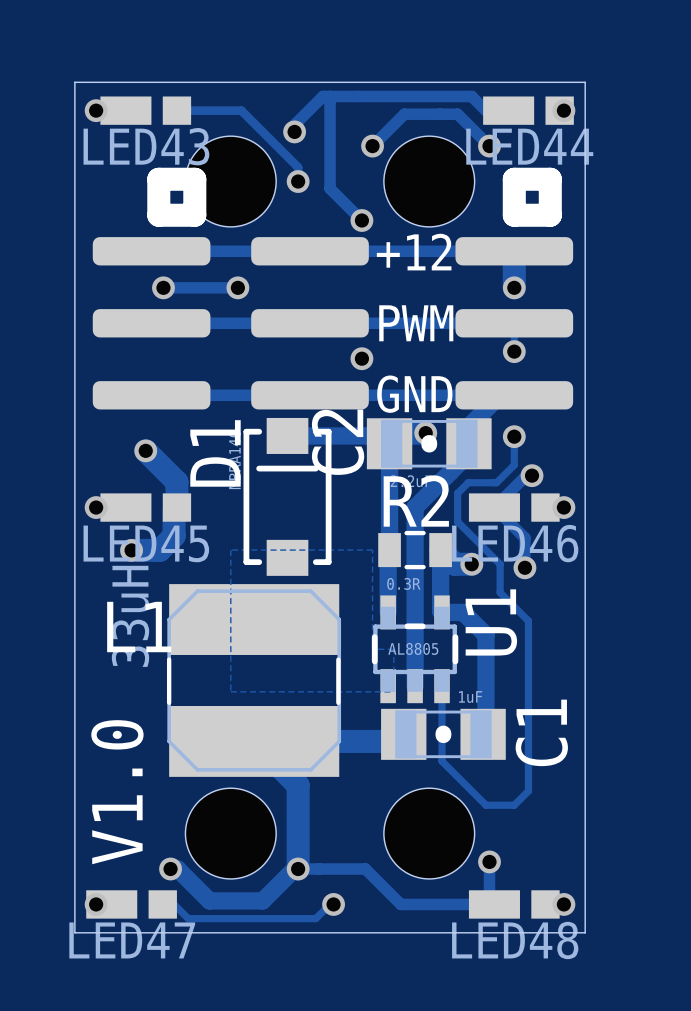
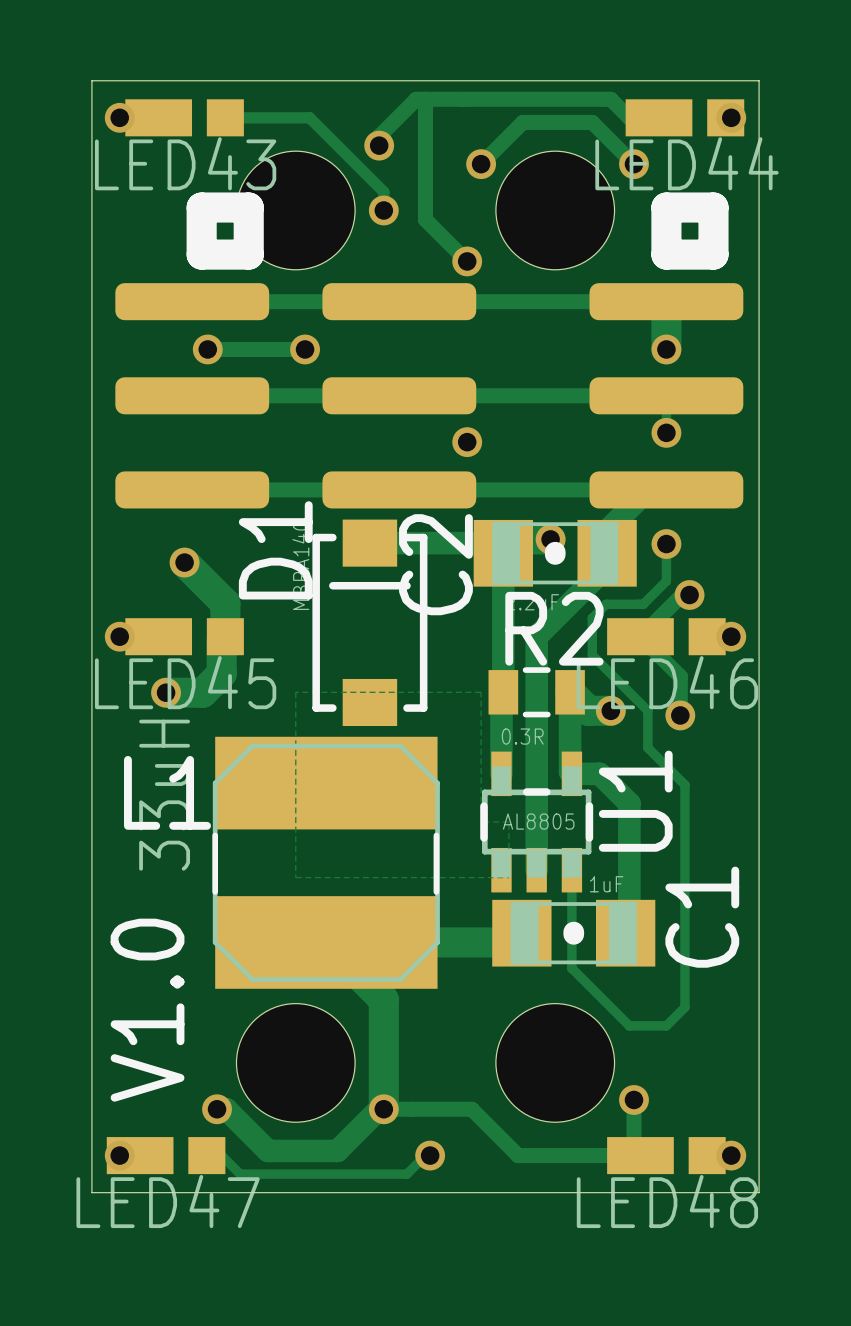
text: +12 (414, 252) -> none
text: PWM (416, 323) -> none
text: GND (414, 394) -> none

